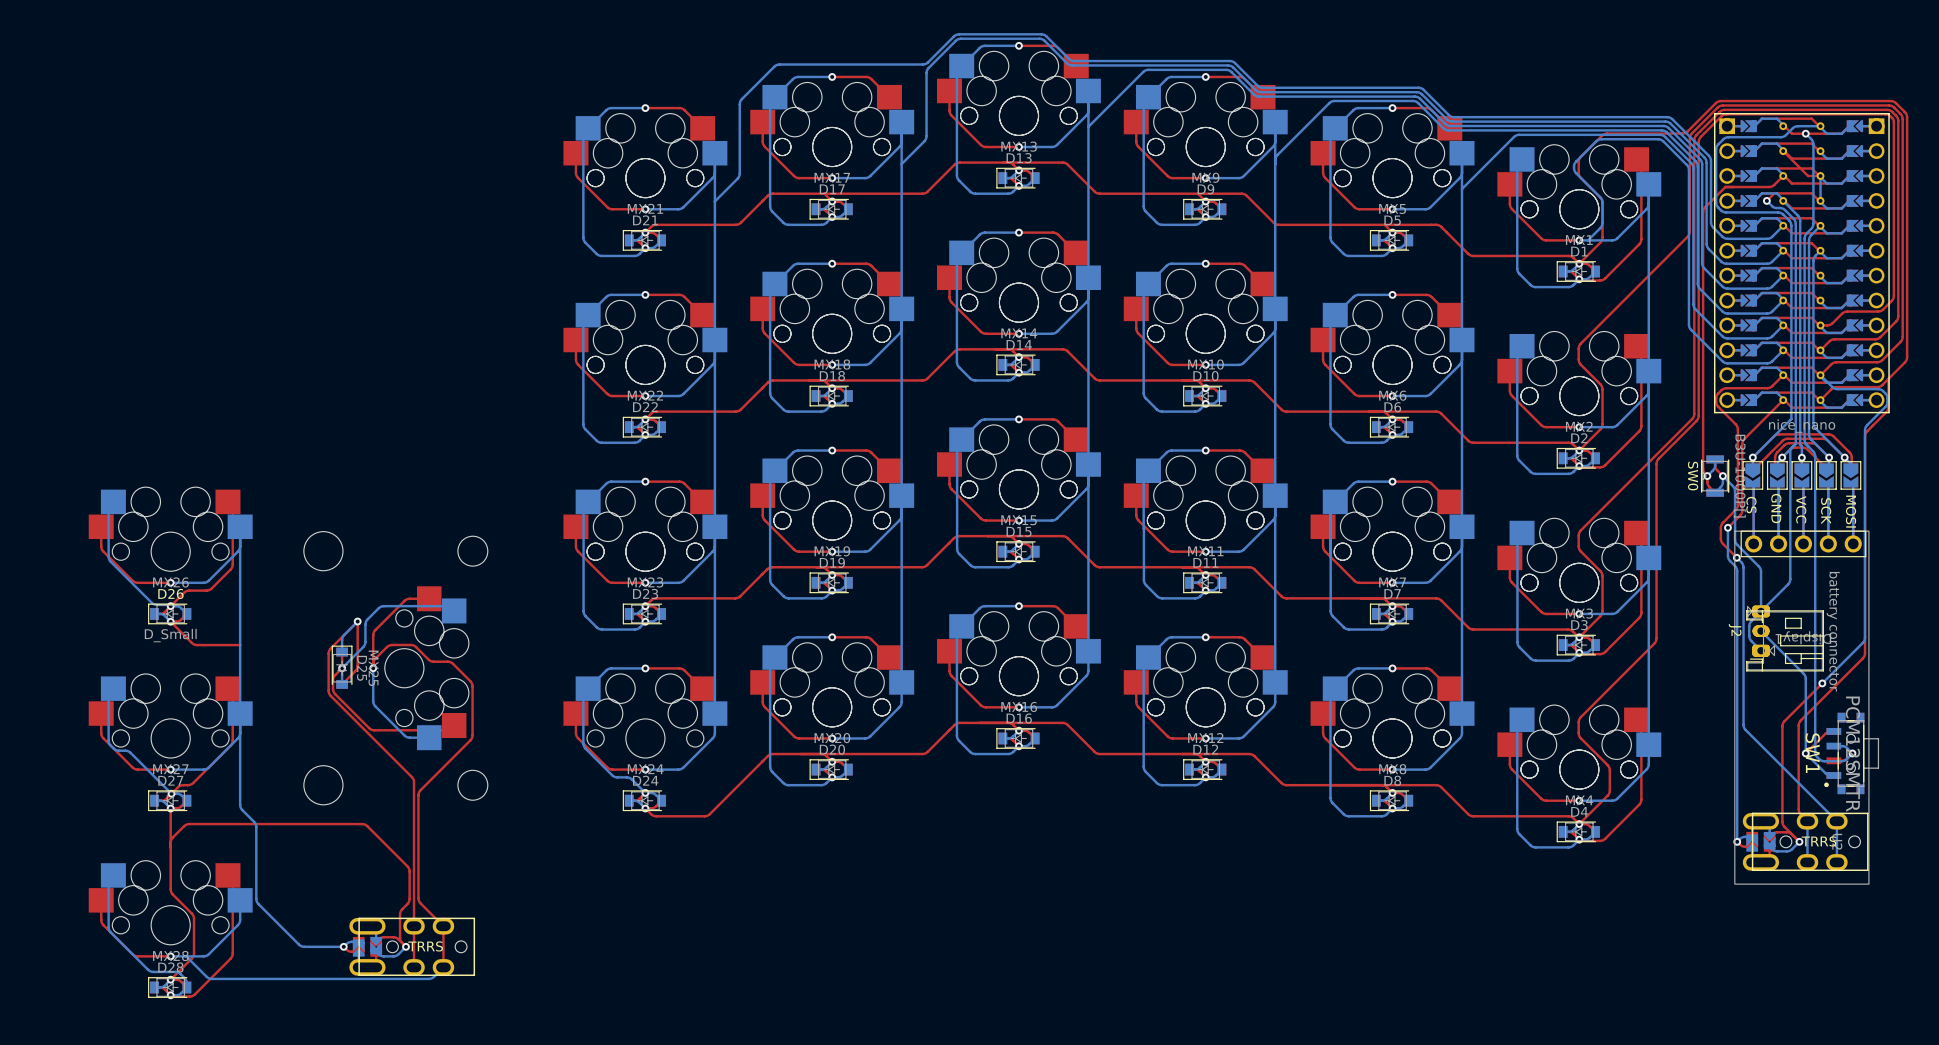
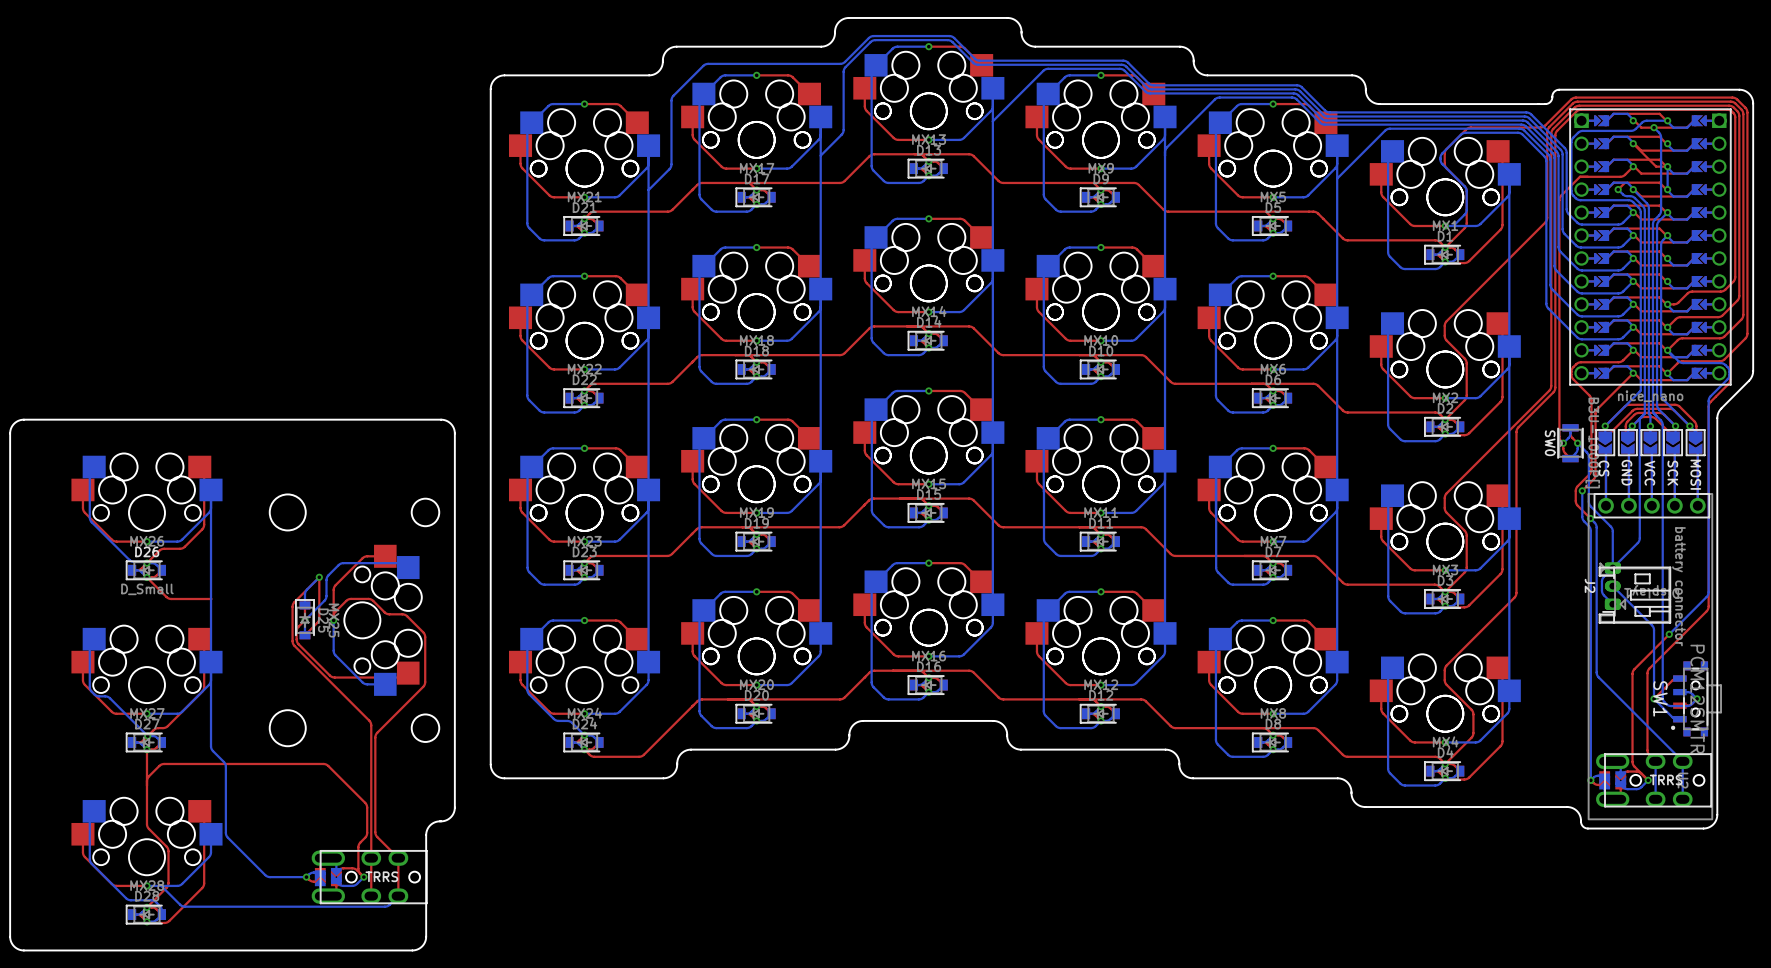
board edge: none -> (1007, 17) (847, 18) (838, 23) (832, 40) (824, 46) (675, 46) (665, 51) (660, 68) (652, 75) (504, 75) (497, 77) (492, 81) (490, 89) (490, 764) (493, 773) (504, 778) (664, 778) (674, 773) (679, 756) (687, 749) (837, 749) (846, 744) (851, 727) (860, 721) (993, 720) (1003, 724) (1009, 743) (1019, 749) (1170, 750) (1177, 757) (1182, 773) (1191, 778) (1340, 778) (1349, 784) (1354, 801) (1363, 806) (1567, 807) (1576, 811) (1581, 825) (1587, 828) (1703, 828) (1712, 825) (1717, 814) (1717, 416) (1721, 408) (1750, 379) (1753, 372) (1753, 103) (1750, 94) (1739, 89) (1559, 89) (1554, 91) (1551, 100) (1546, 104) (1378, 103) (1368, 98) (1363, 81) (1355, 75) (1205, 75) (1196, 70) (1192, 54) (1184, 47) (1033, 46) (1023, 40) (1017, 22) (1007, 17)
board edge: none -> (441, 419) (23, 419) (13, 424) (10, 433) (10, 936) (15, 947) (23, 950) (412, 950) (423, 945) (426, 936) (426, 832) (432, 823) (449, 818) (454, 807) (454, 433) (450, 423) (441, 419)

